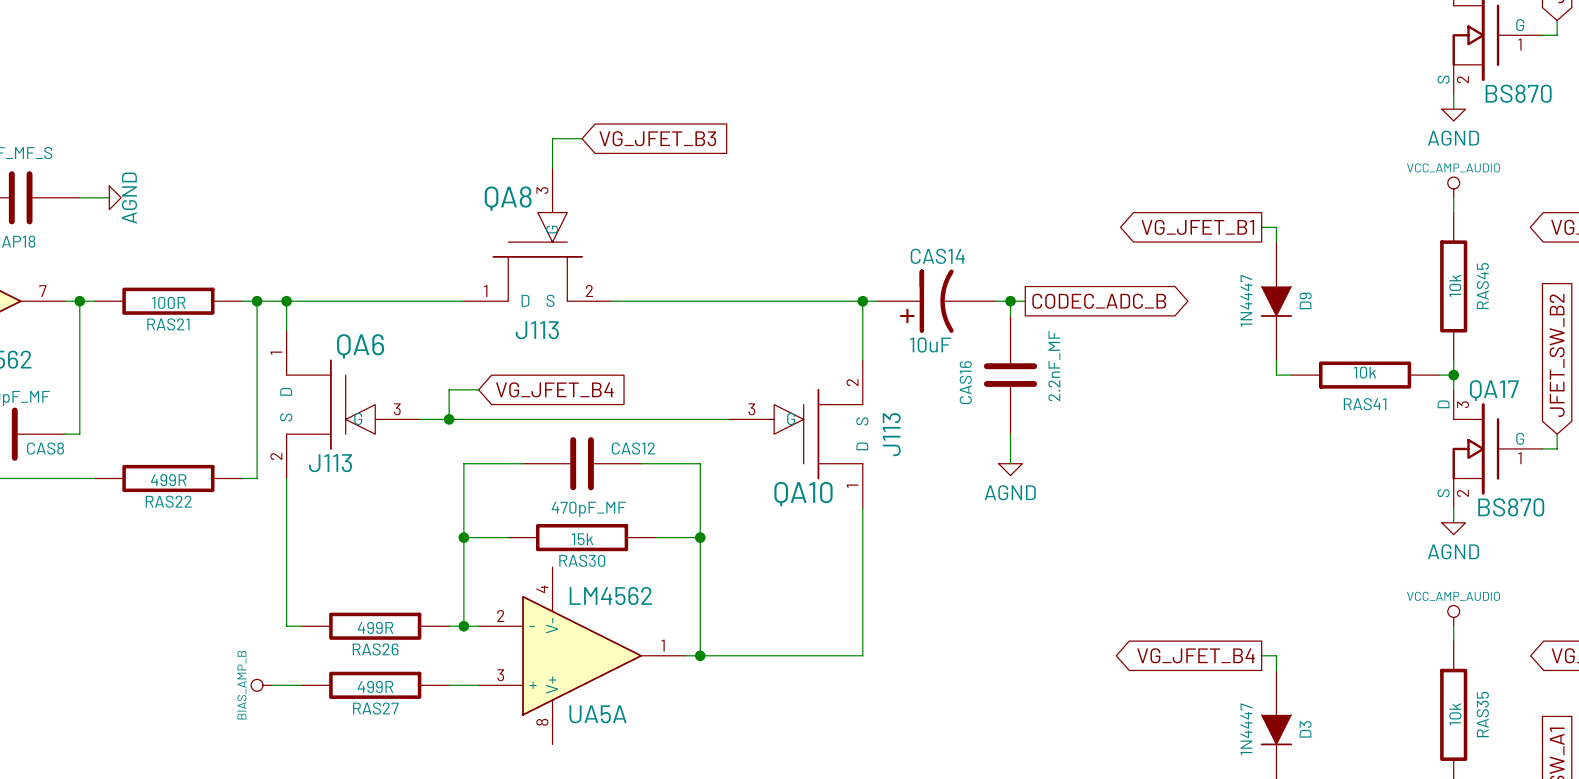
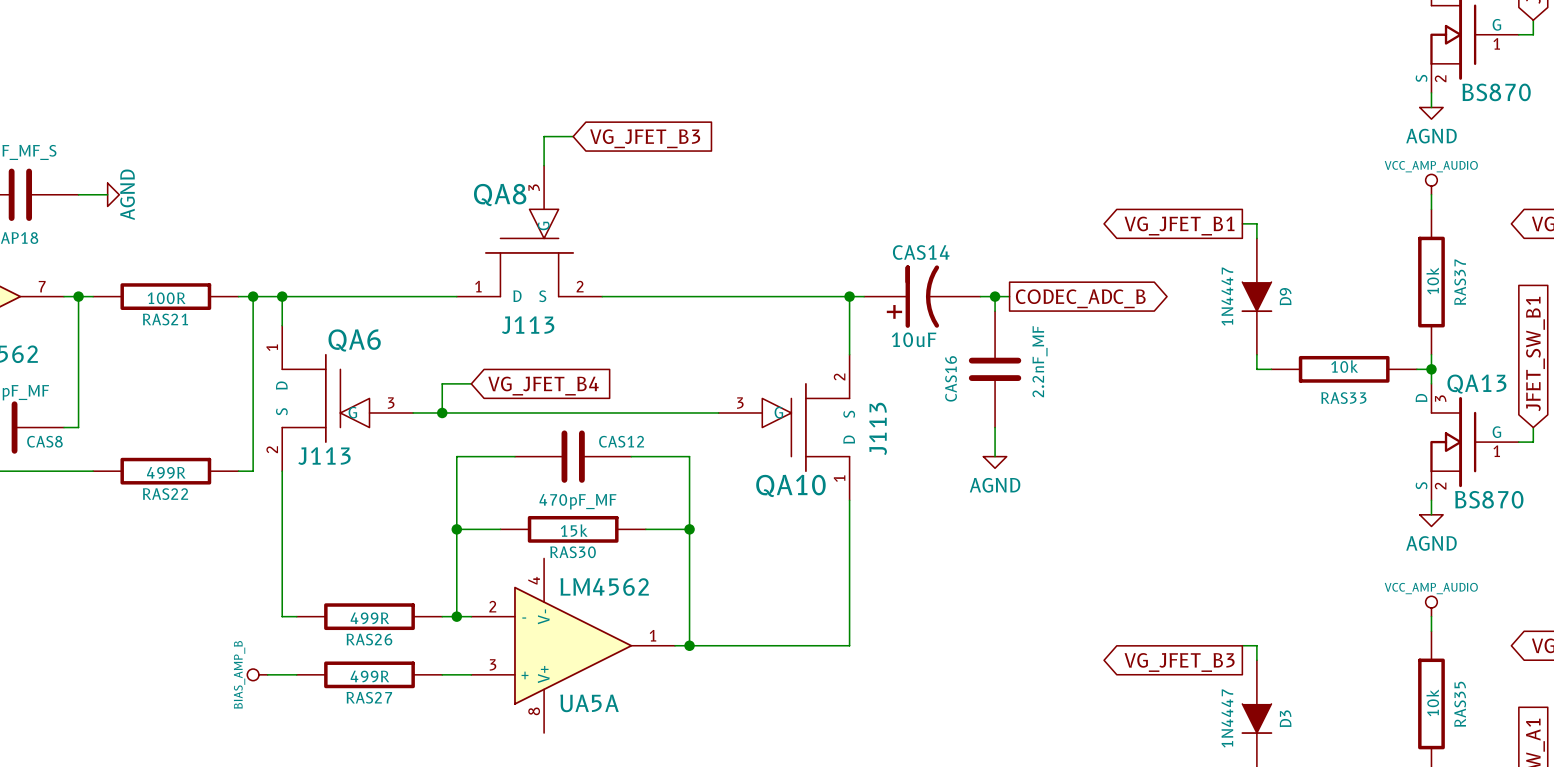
RAS45 name: RAS45 (1482, 286) -> RAS37 (1460, 282)
global label: JFET_SW_B2 (1557, 355) -> JFET_SW_B1 (1535, 353)
QA17 name: QA17 (1494, 390) -> QA13 (1476, 384)
RAS41 name: RAS41 (1365, 404) -> RAS33 (1343, 398)
global label: VG_JFET_B4 (1196, 655) -> VG_JFET_B3 (1179, 662)

